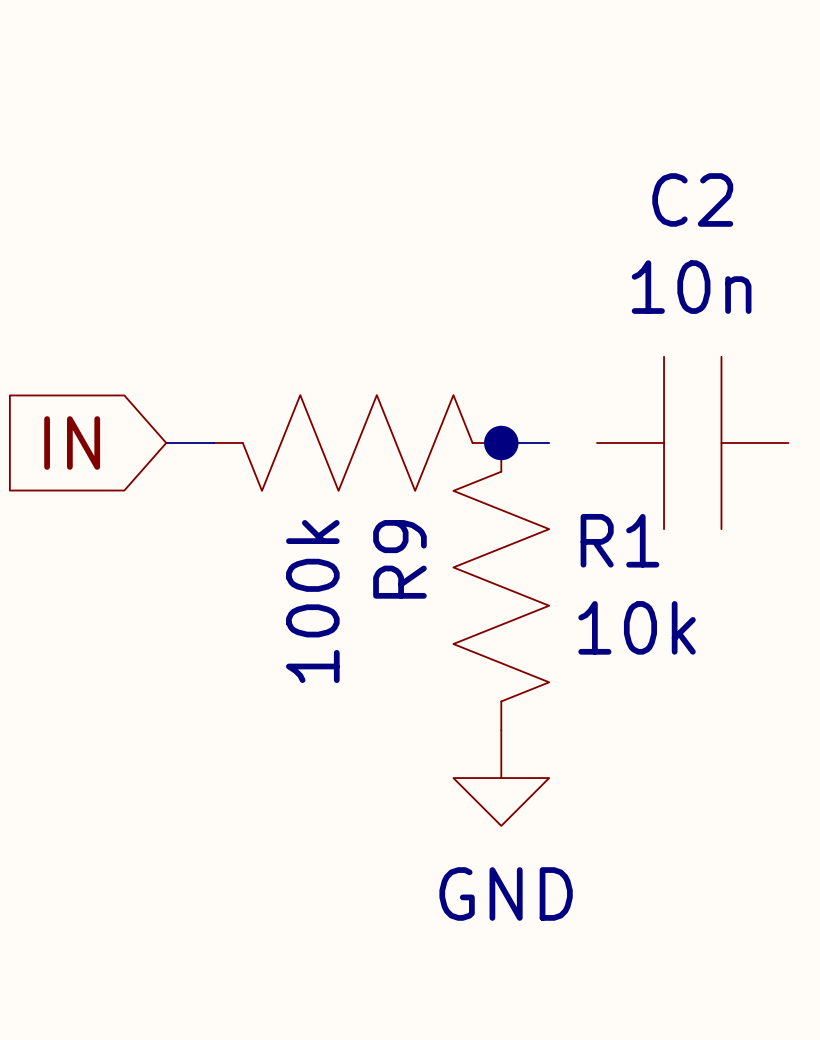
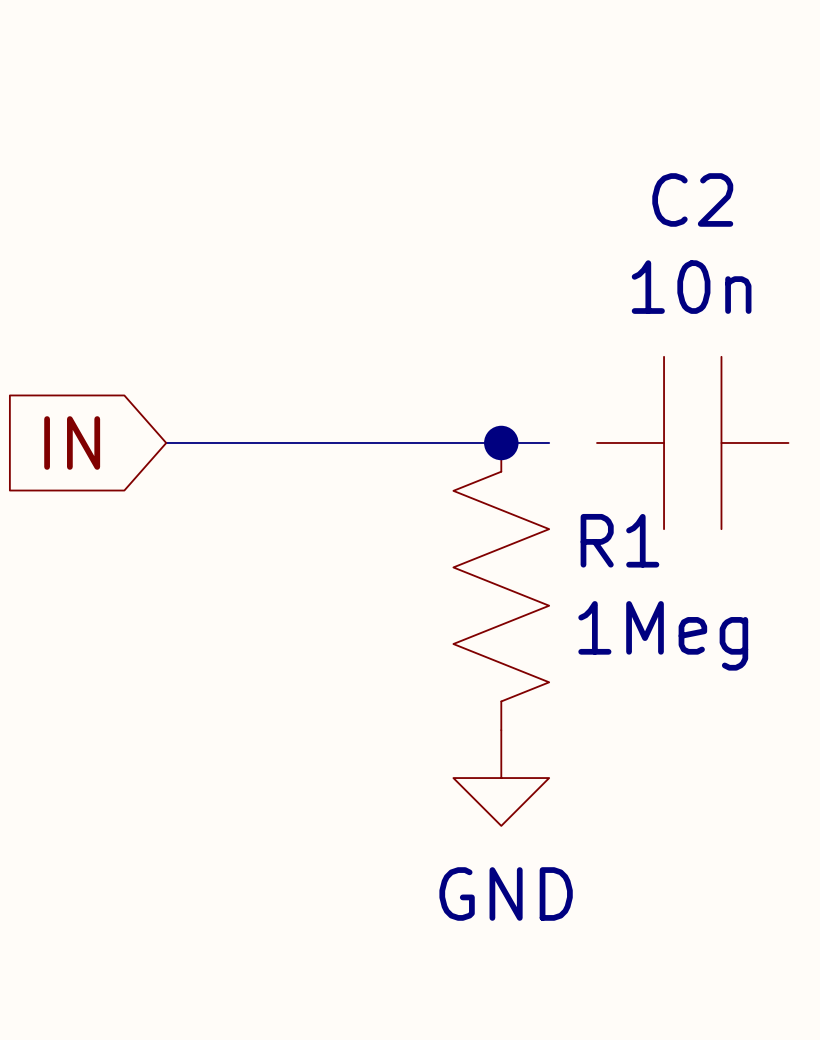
wire: none -> (214, 442) (501, 442)
R9: 100k (357, 442) -> none
R1 value: 10k (637, 627) -> 1Meg (663, 635)

